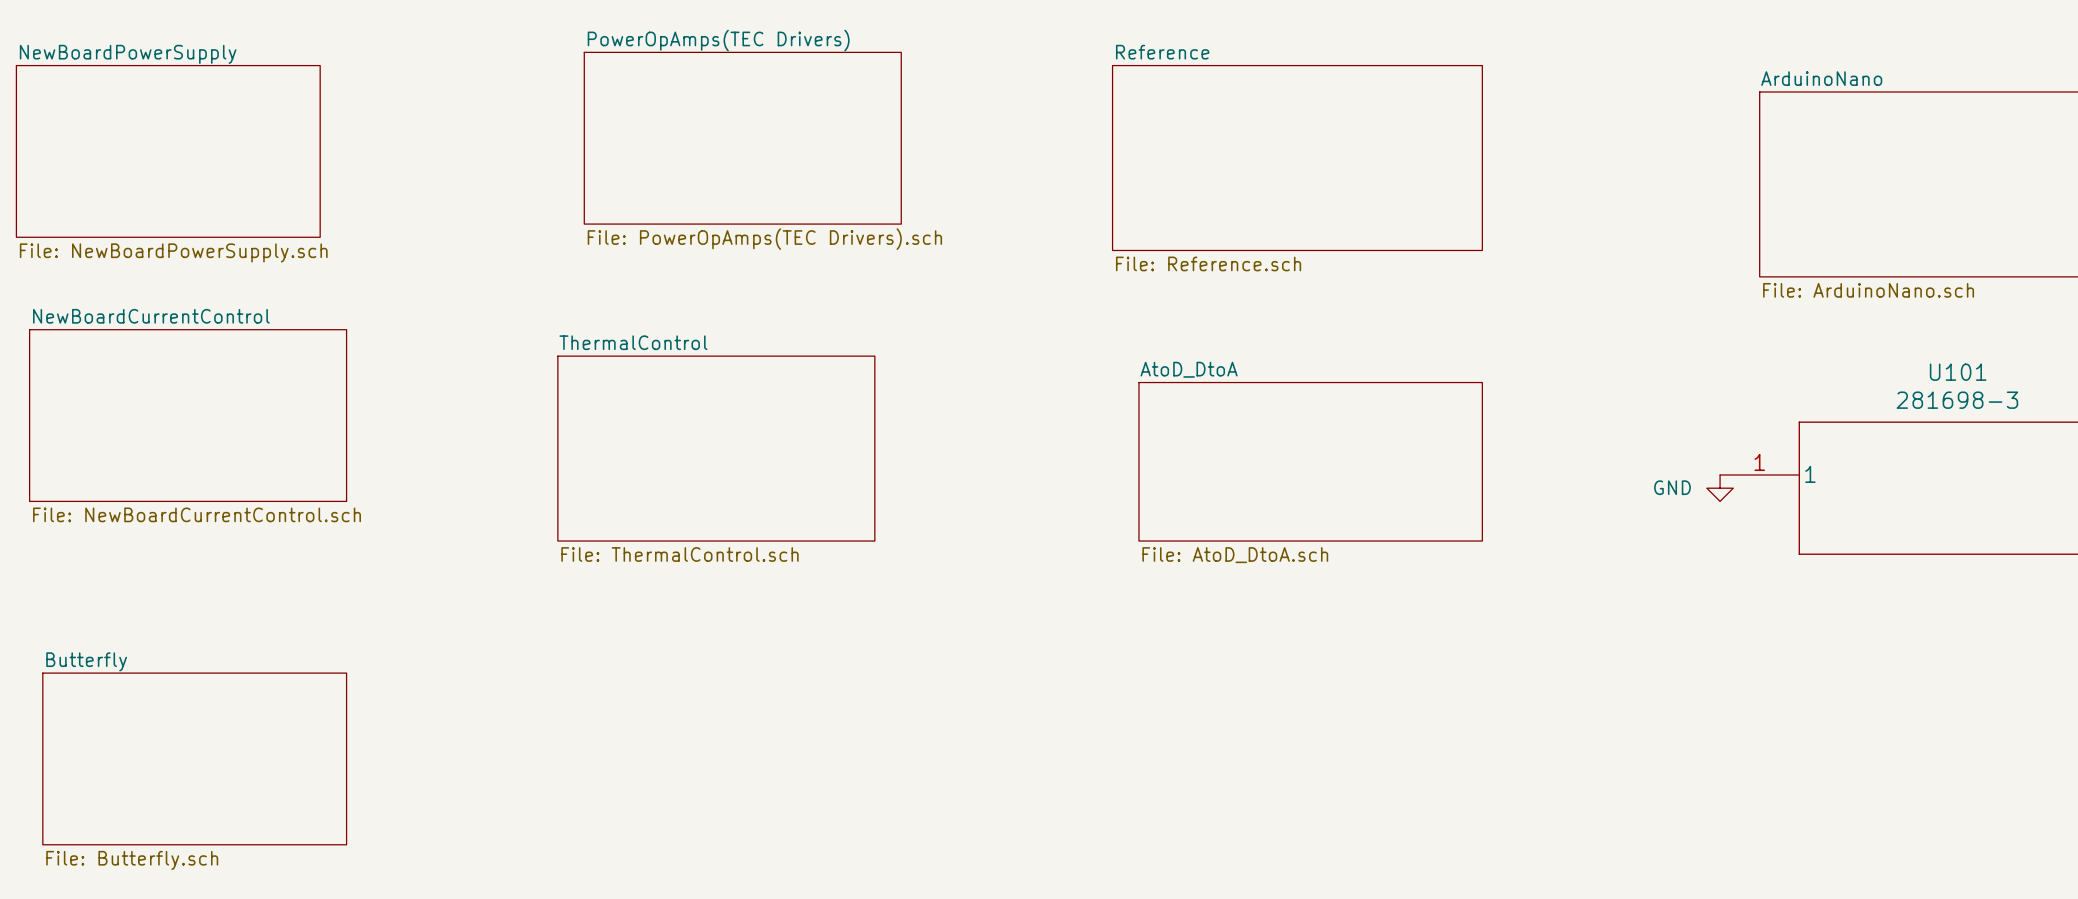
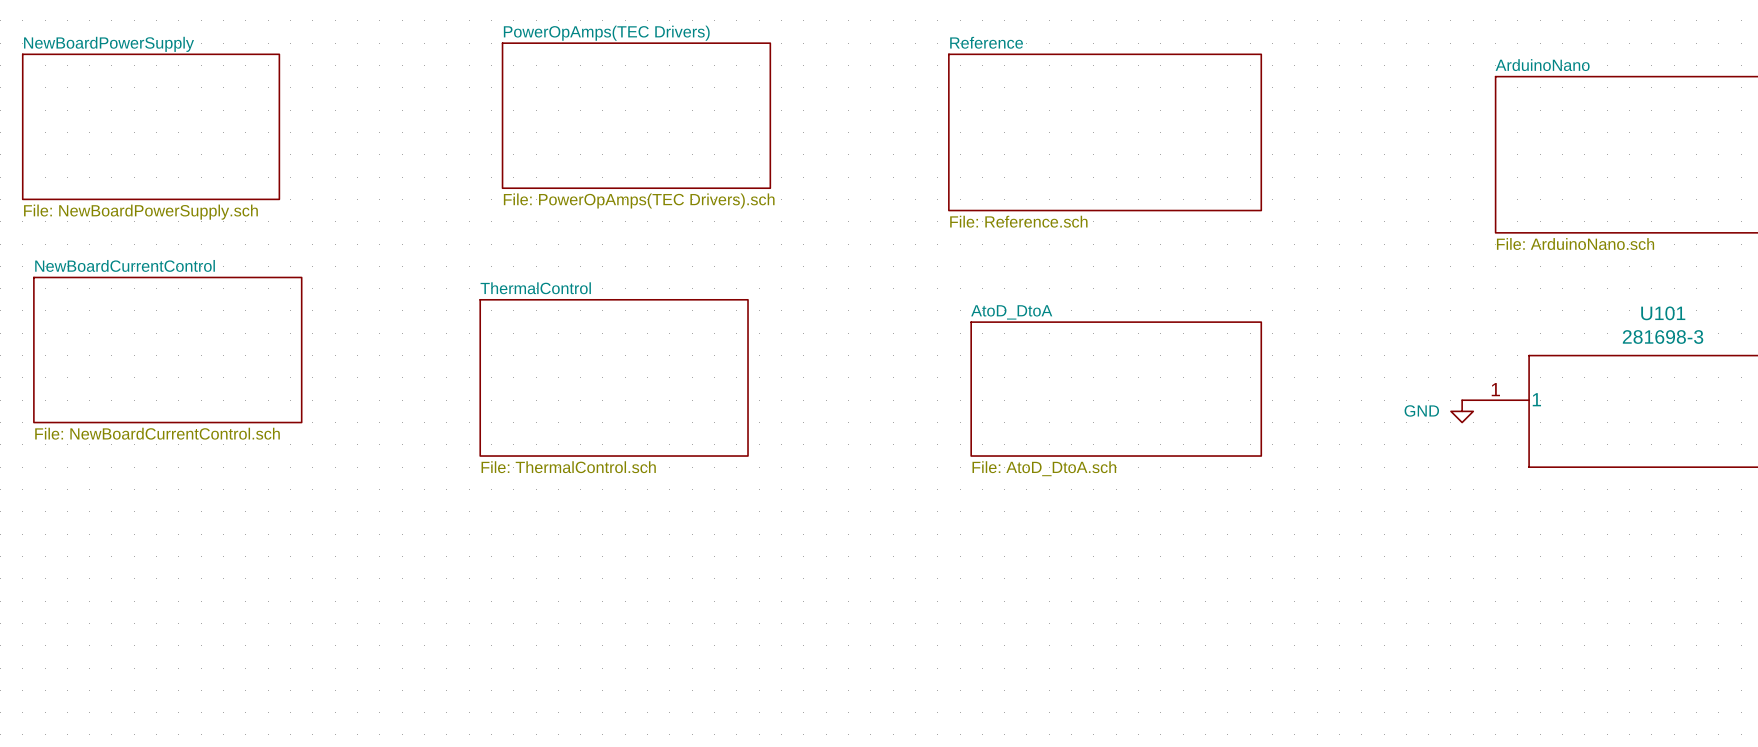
sheet Butterfly: File: Butterfly.sch (194, 758) -> none

